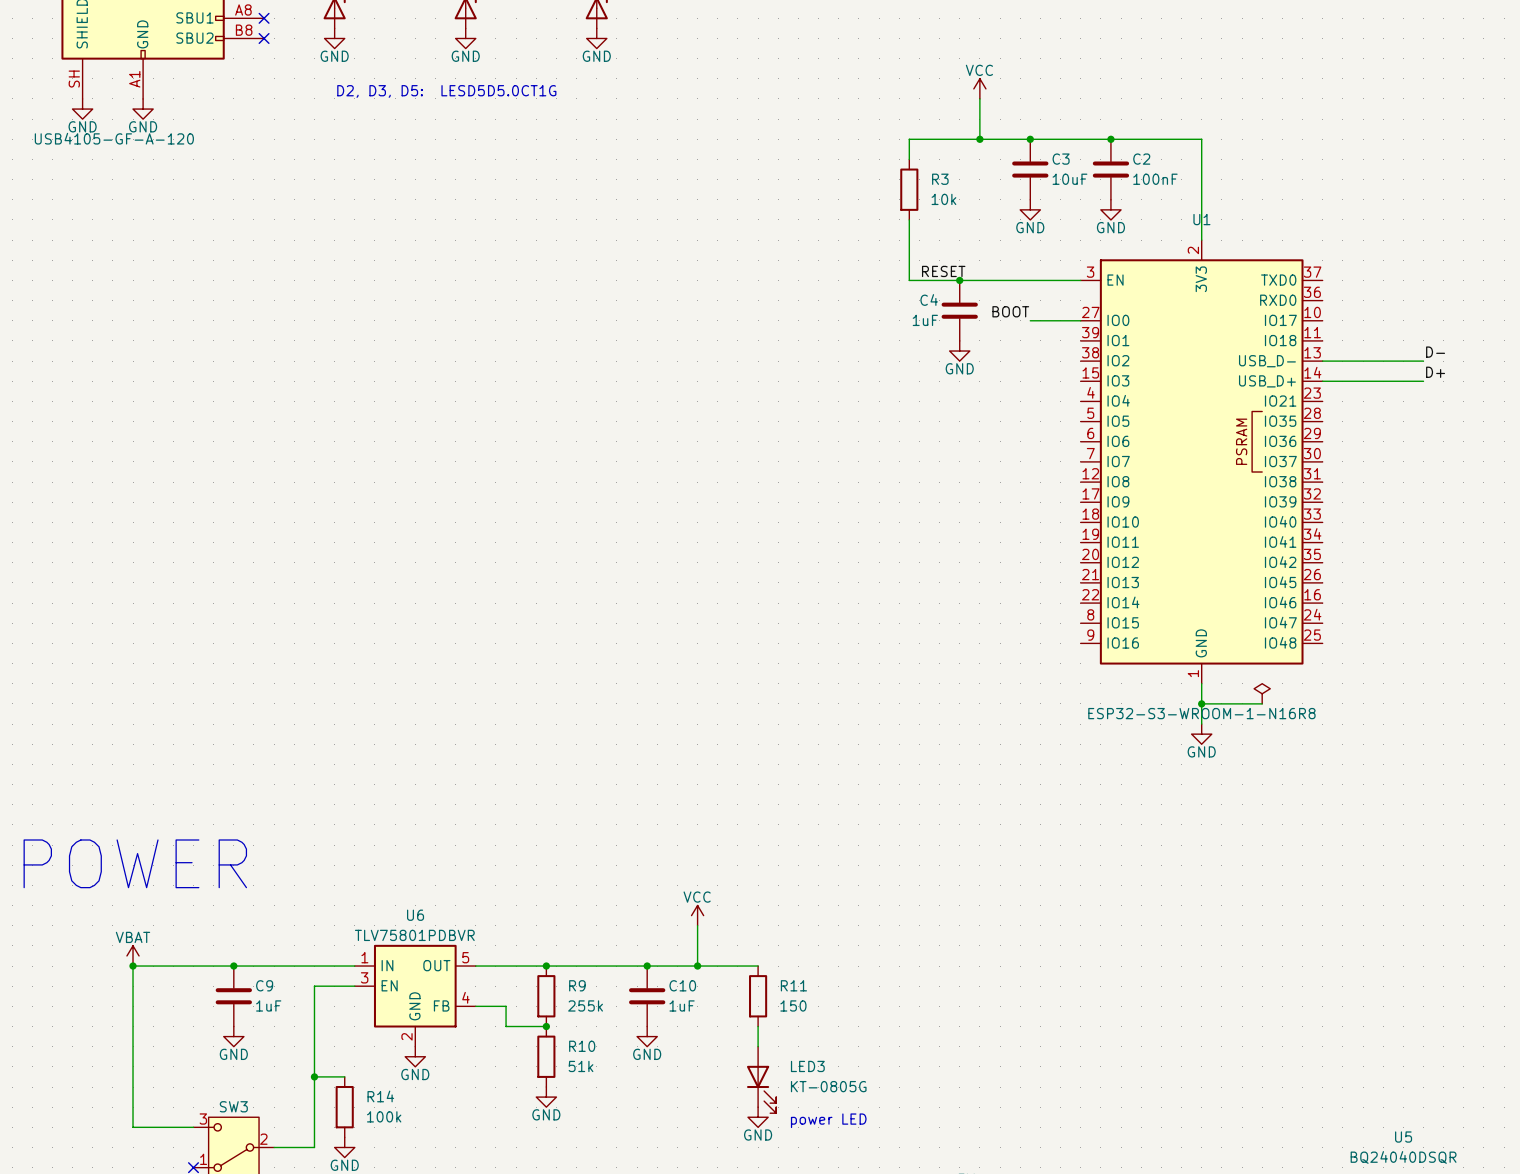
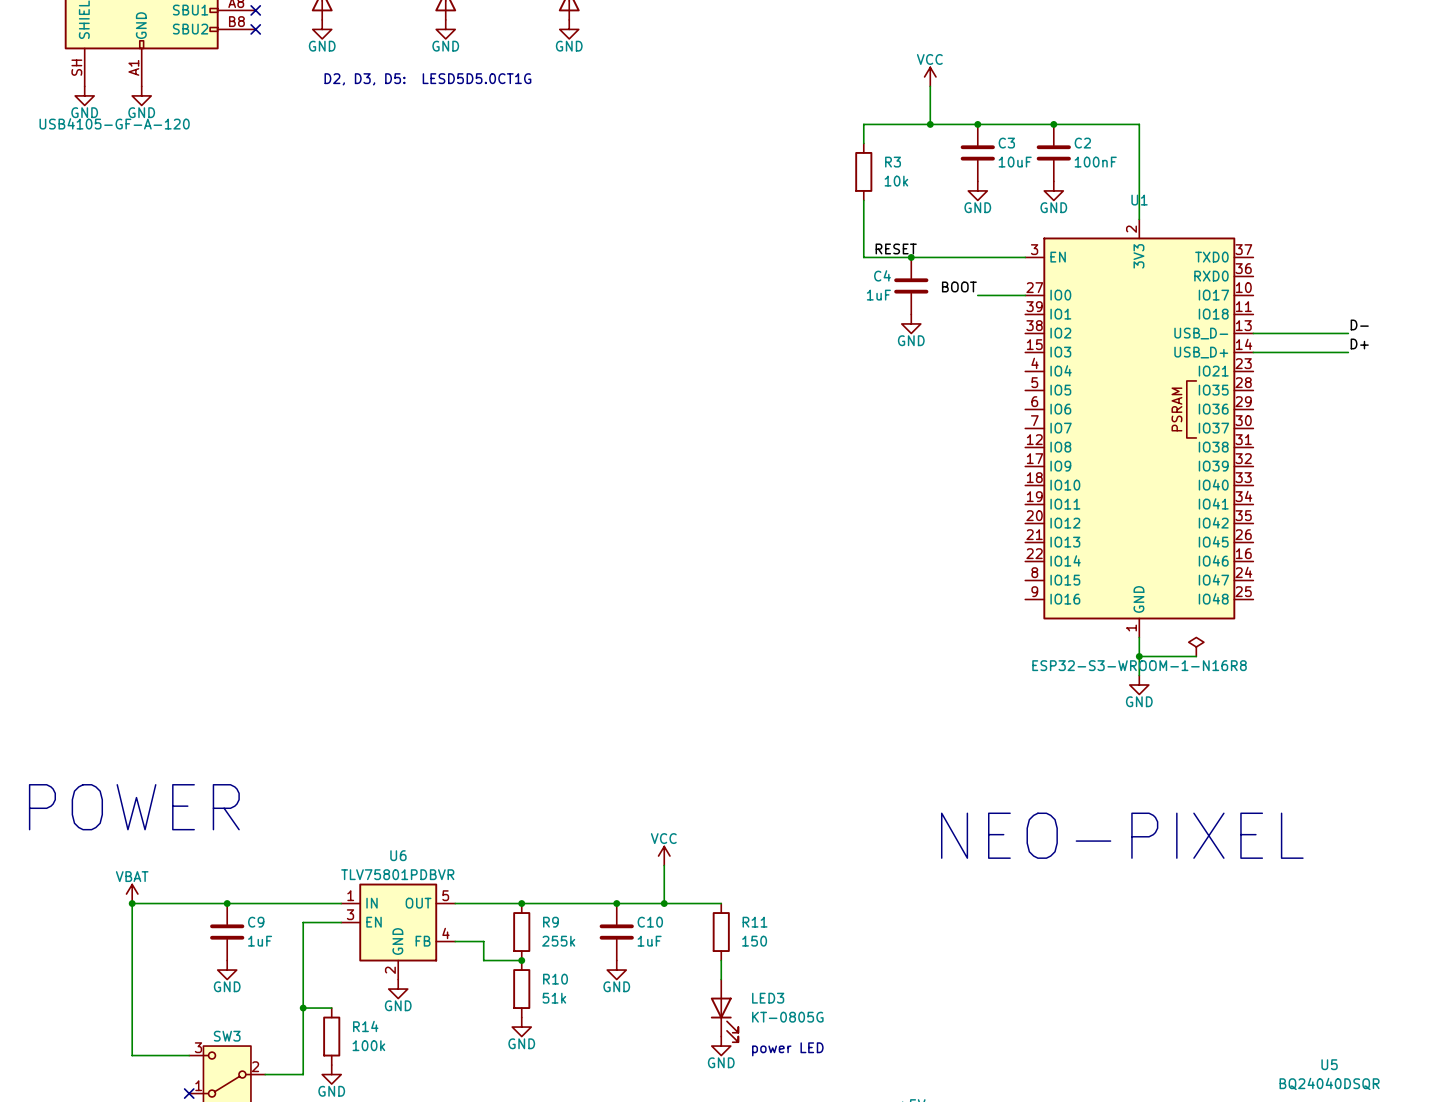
text: none -> NEO-PIXEL (1122, 835)

